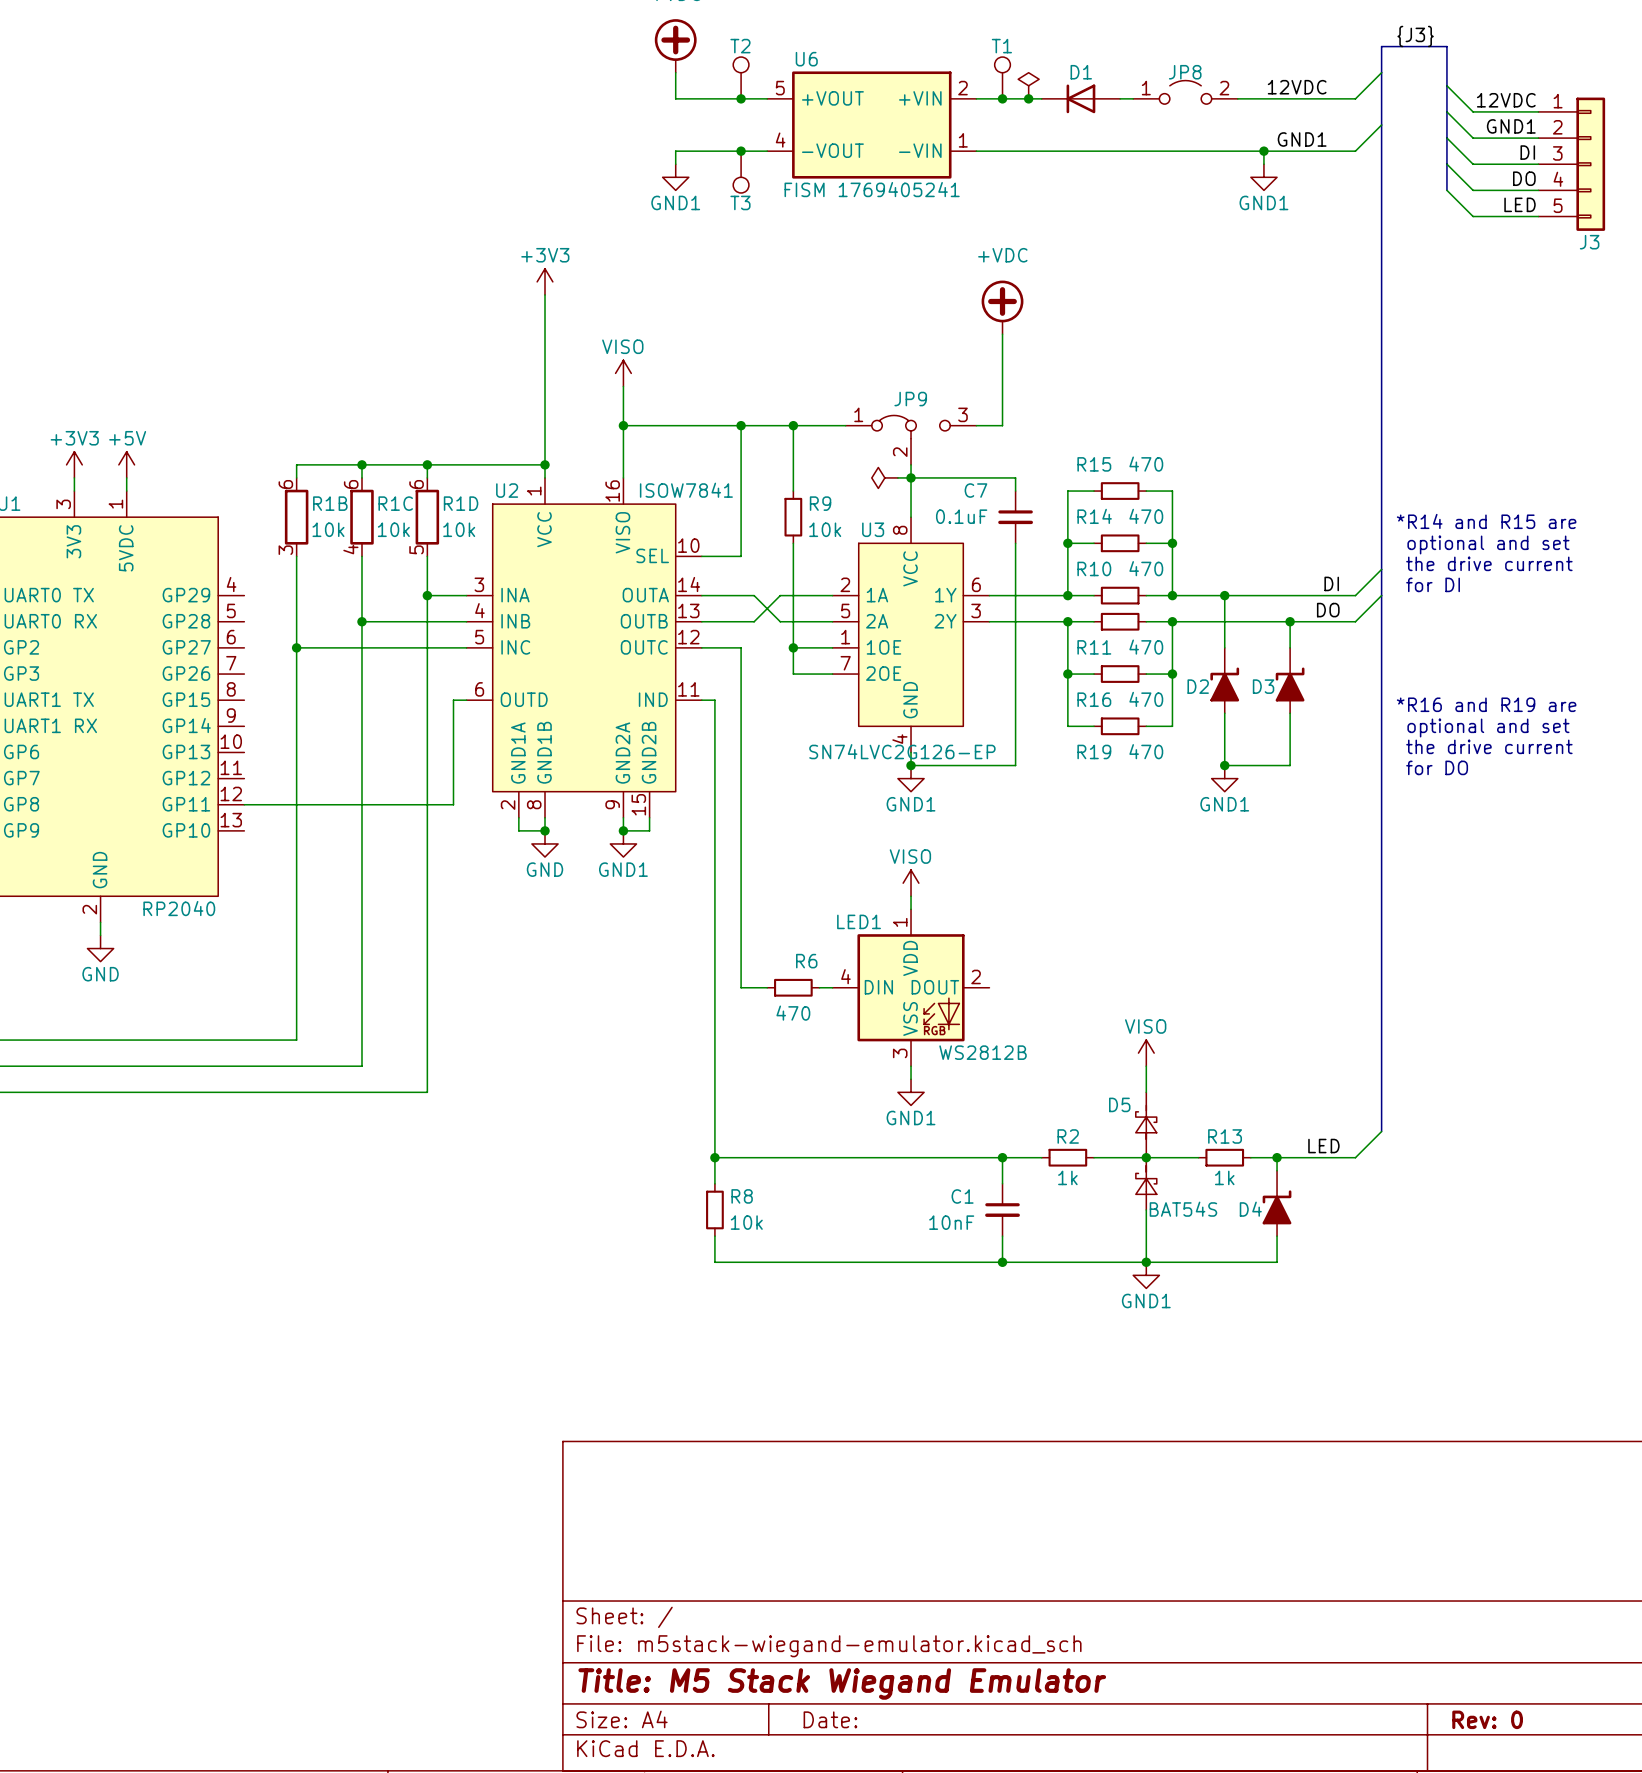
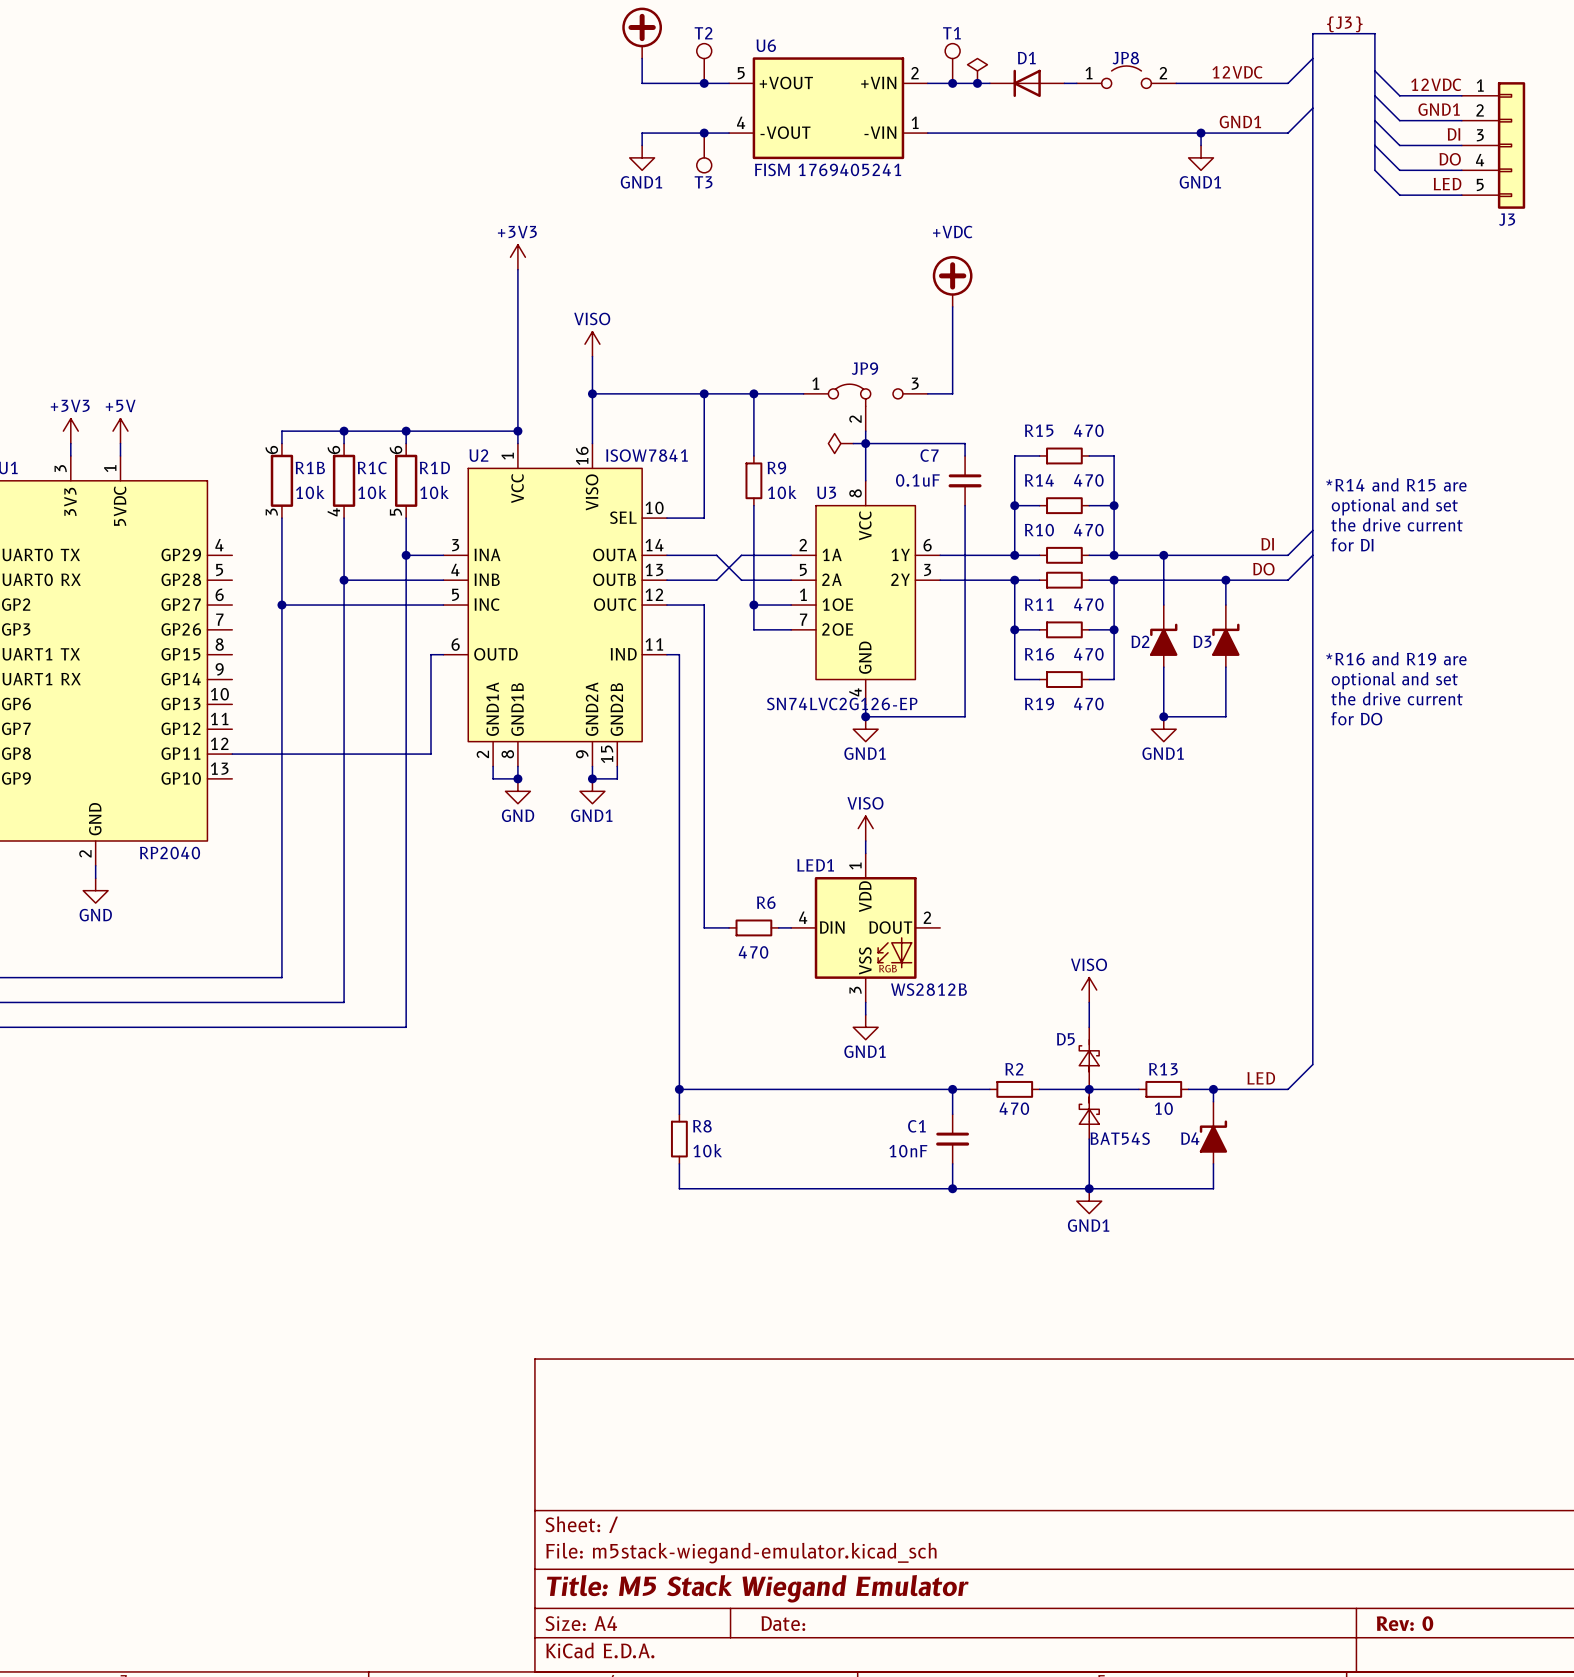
R2 value: 1k (1067, 1177) -> 470 (1014, 1108)
R13 value: 1k (1224, 1177) -> 10 (1163, 1108)

